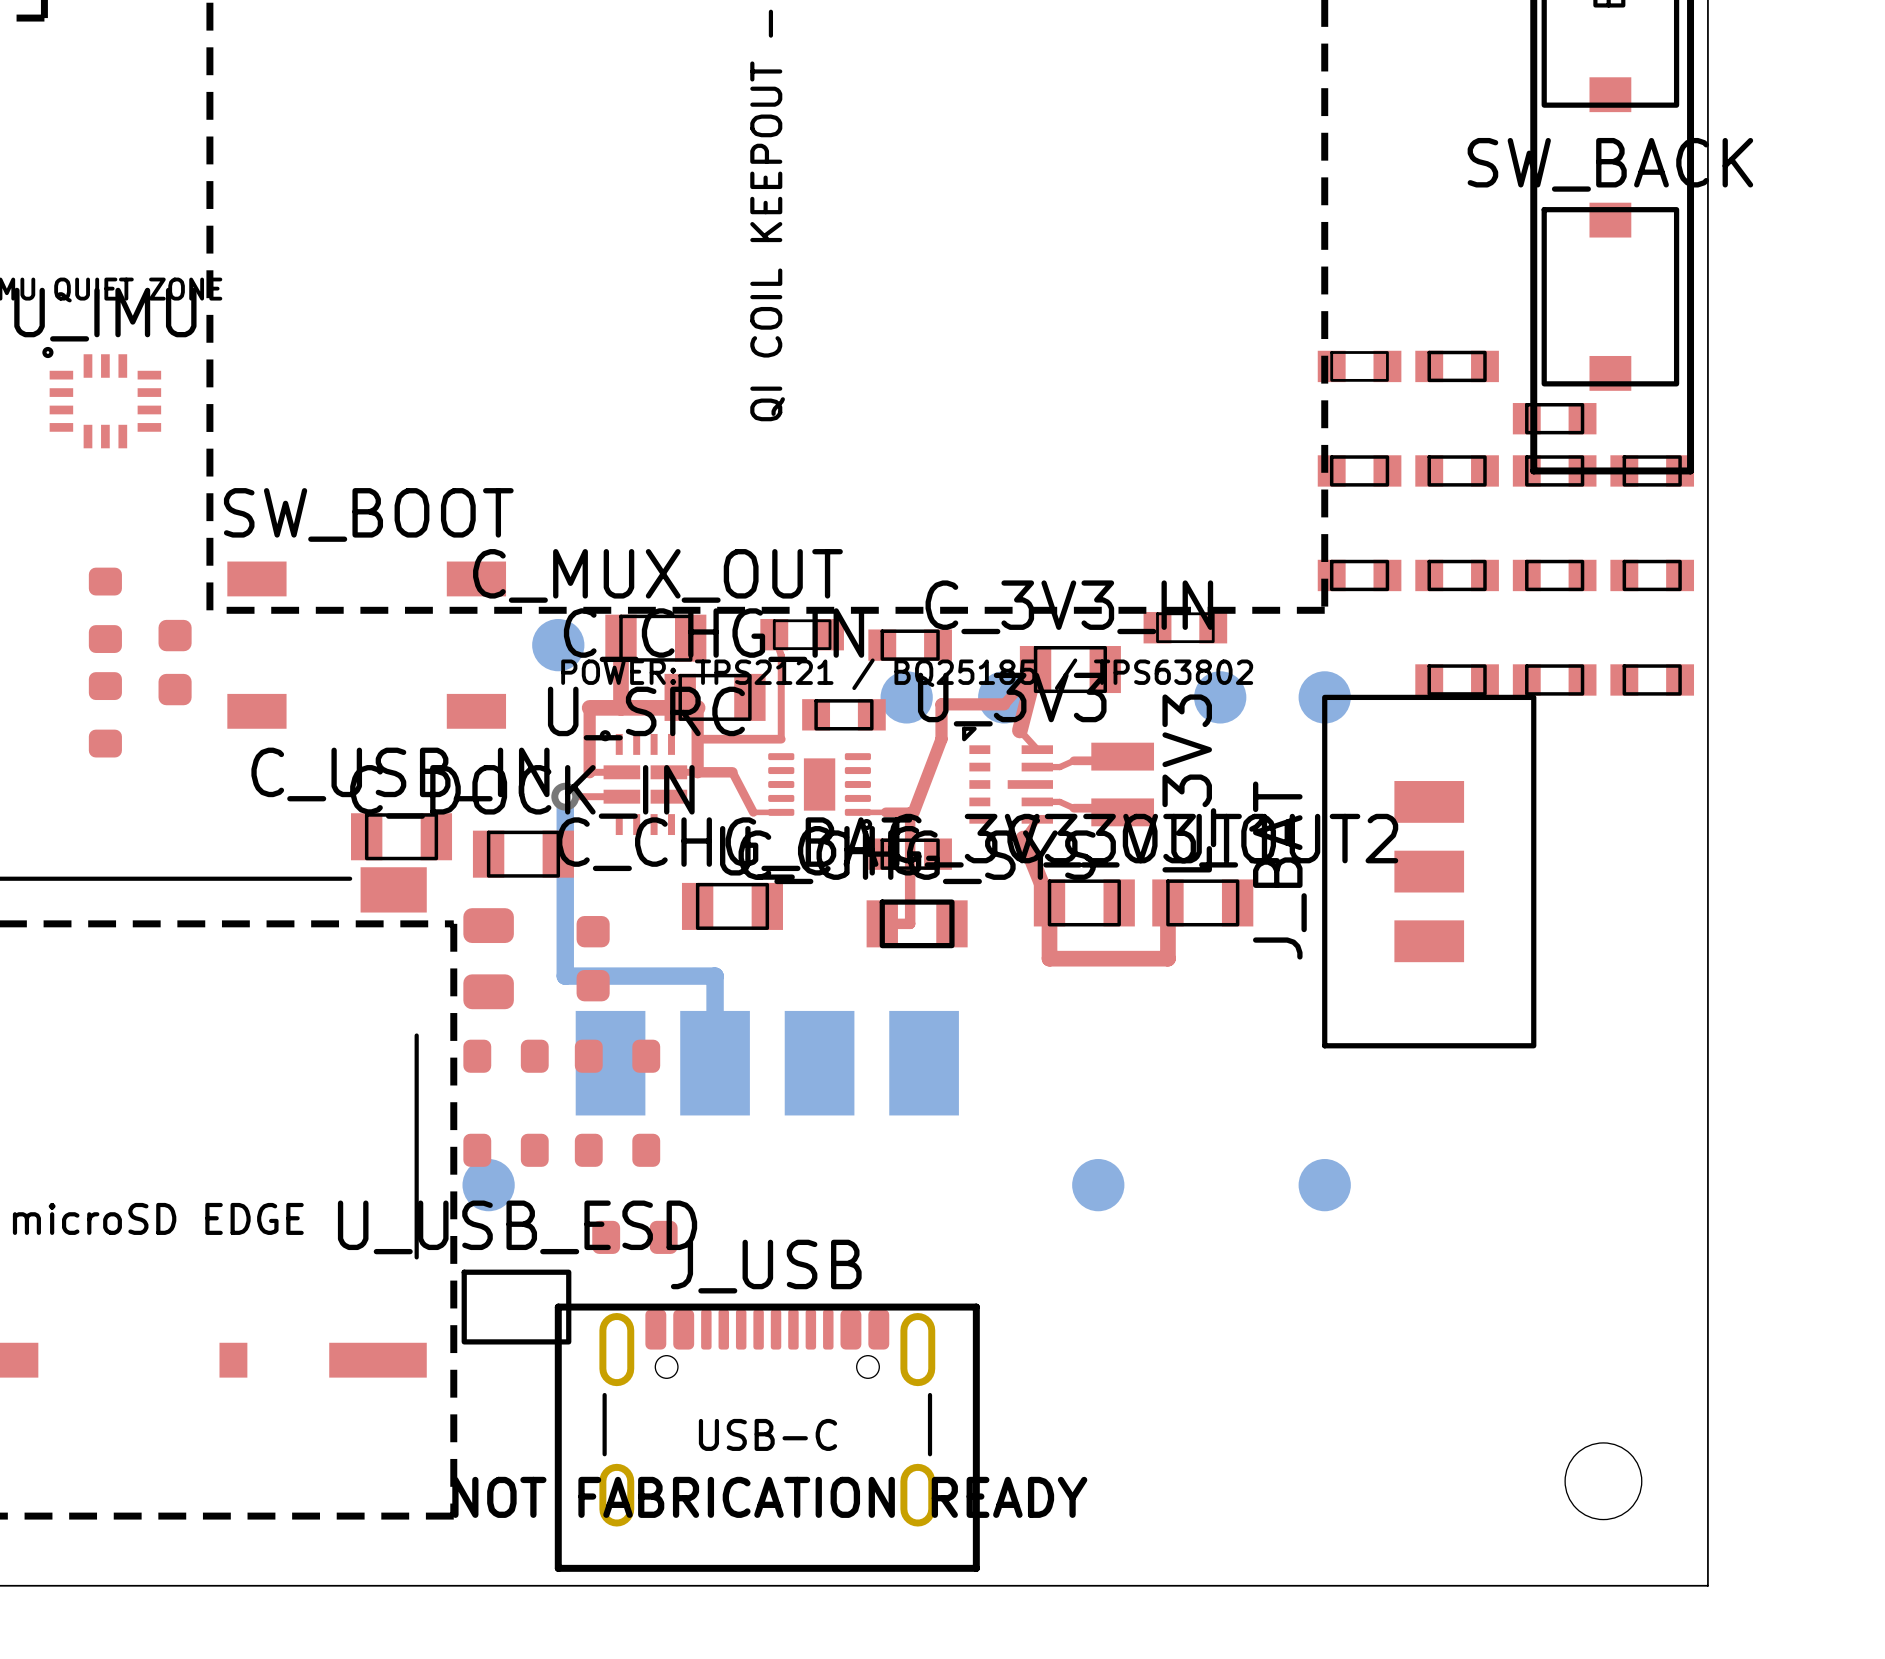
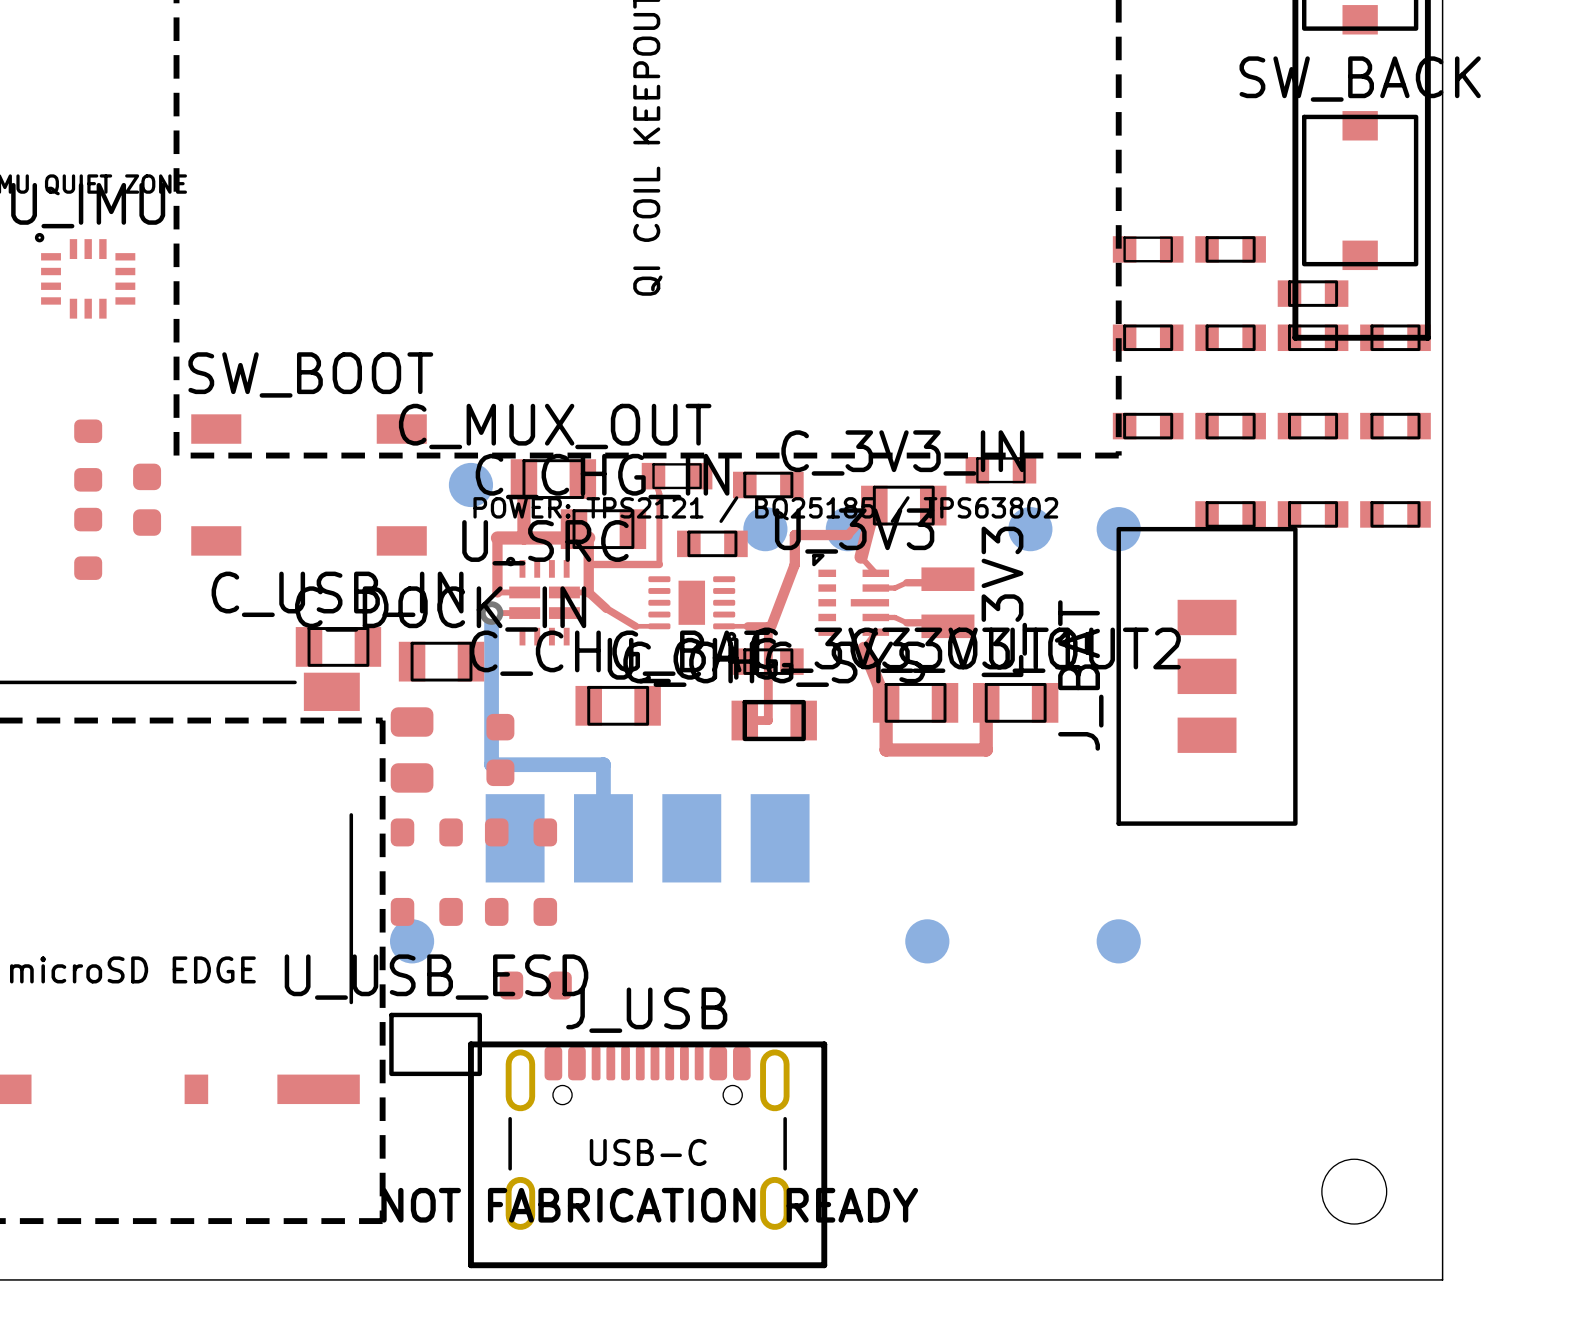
top track: (697, 772) (732, 772) (753, 812) -> (588, 592) (606, 608) (635, 626)
bottom track: (565, 796) (565, 976) (582, 976) -> (491, 613) (491, 764)
via position: (565, 796) -> (491, 613)

